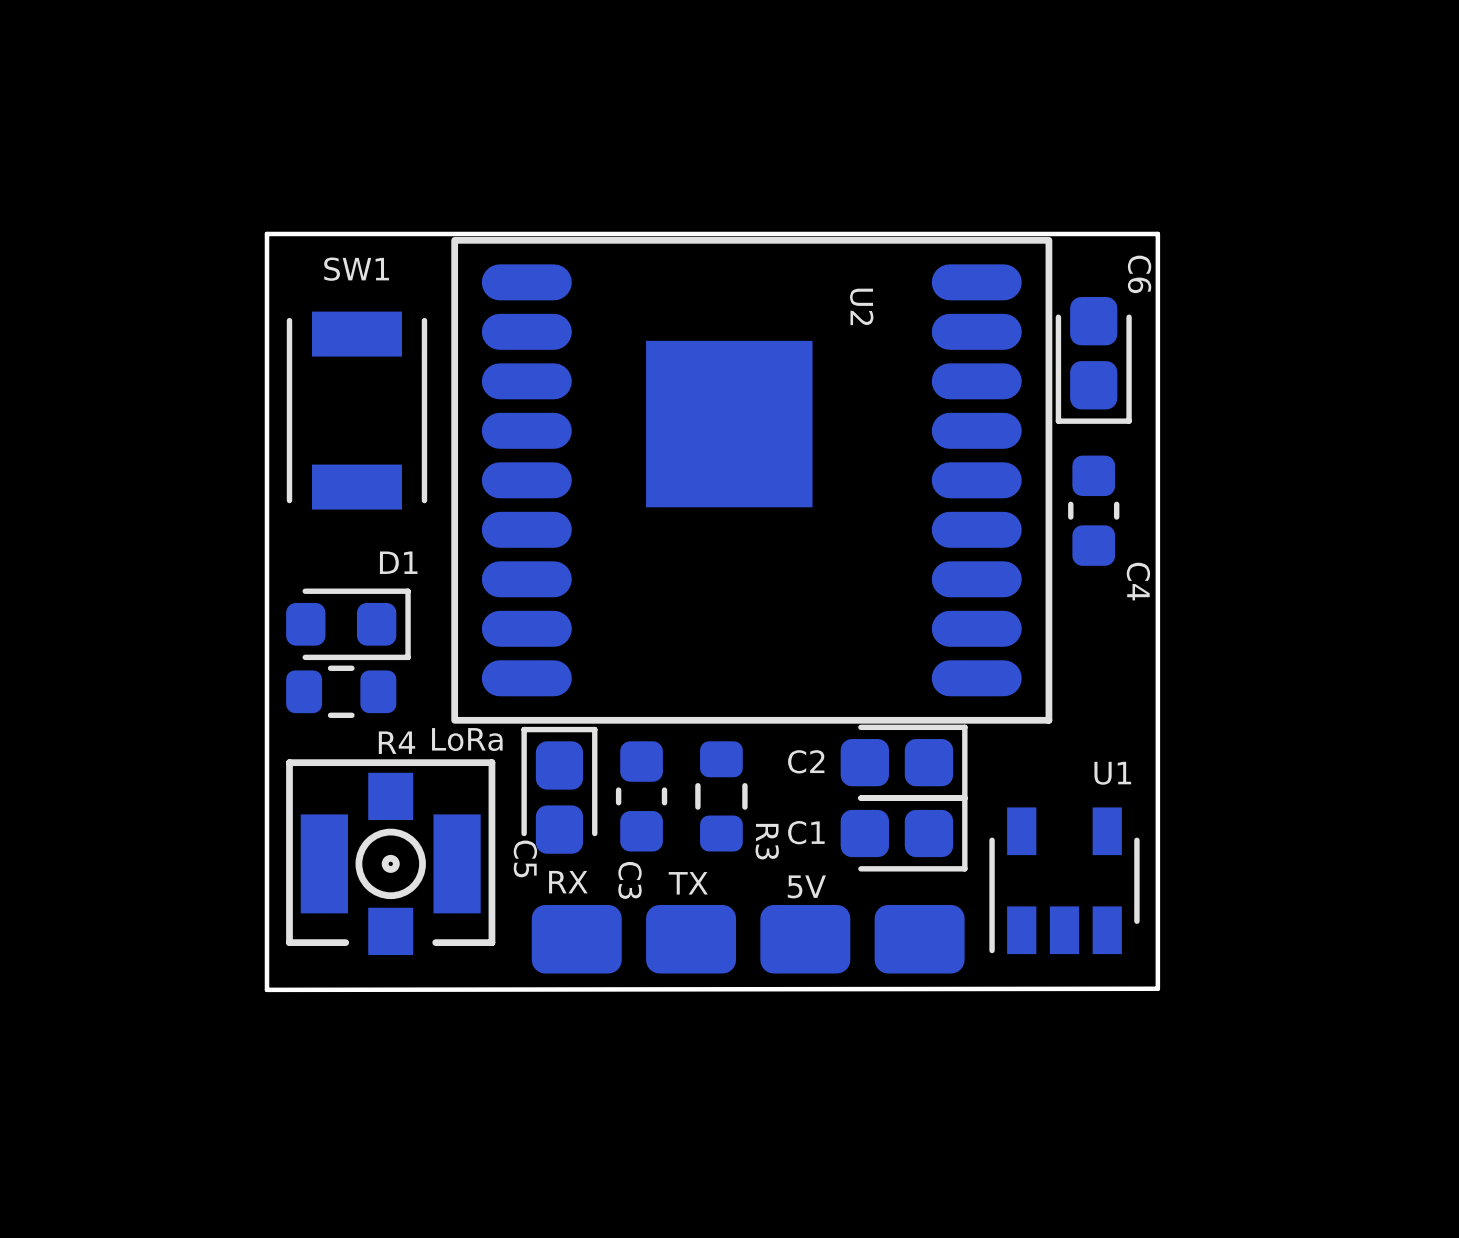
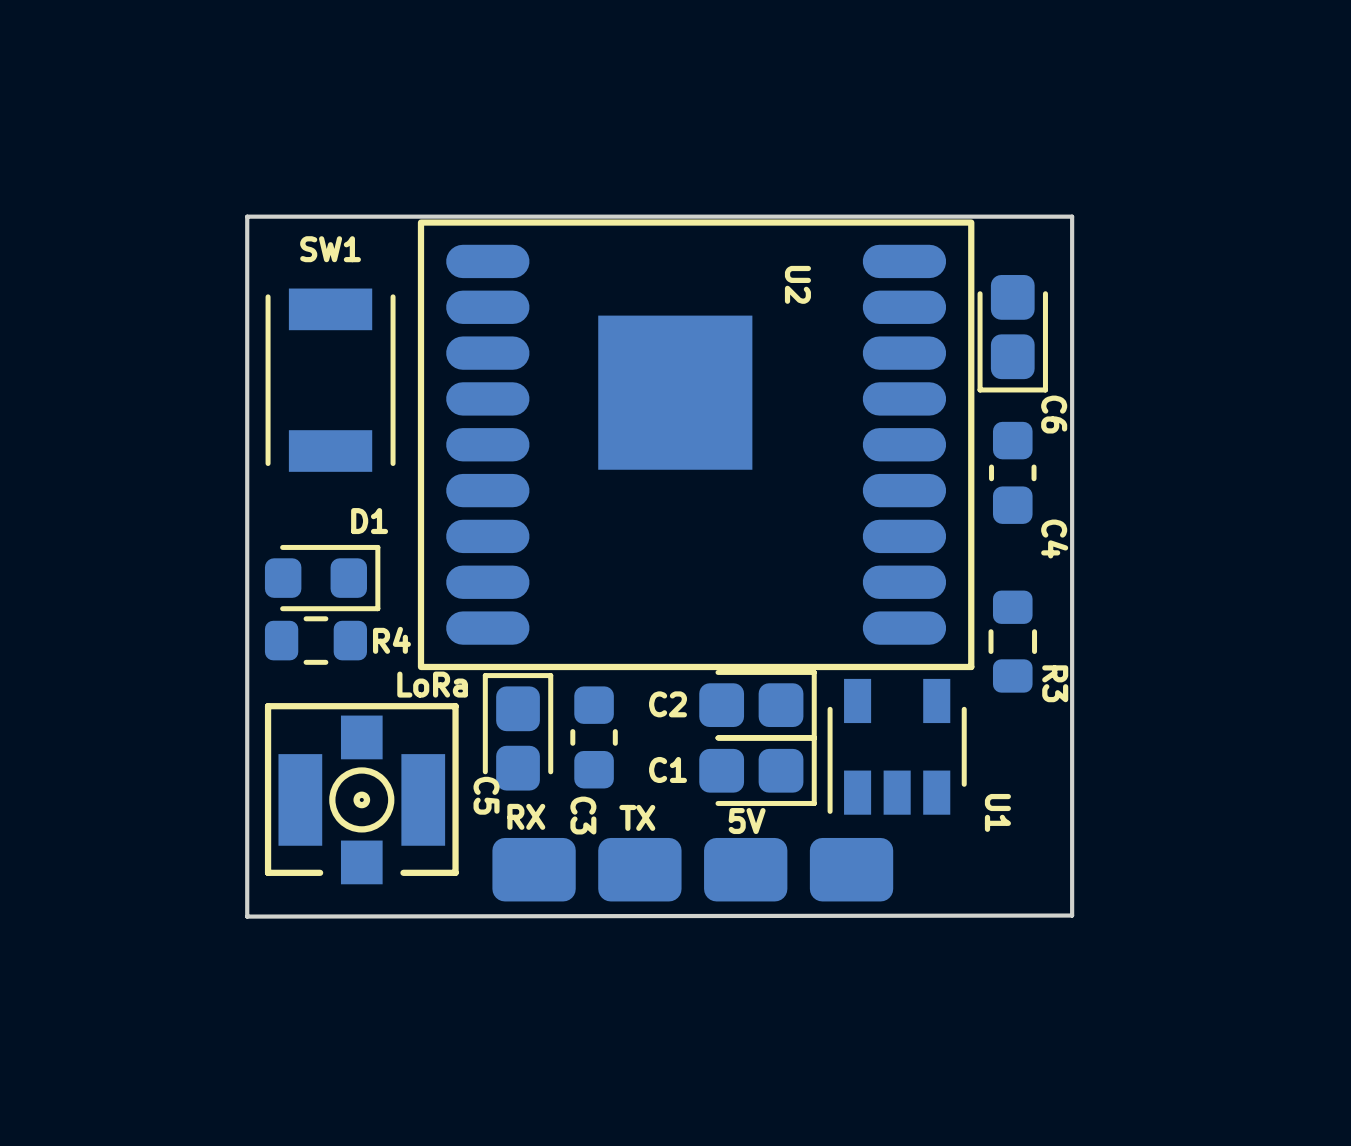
C6 name position: C6 (1139, 274) -> C6 (1054, 414)
R4 name position: R4 (396, 742) -> R4 (391, 640)
C2 position: (904, 762) -> (758, 705)
U1 name rotation: 0° (1112, 773) -> 90° clockwise (997, 812)
U1 name position: U1 (1112, 773) -> U1 (997, 812)
R3 position: (721, 796) -> (1012, 641)
C1 position: (904, 833) -> (758, 770)
U1 position: (1064, 880) -> (897, 746)

